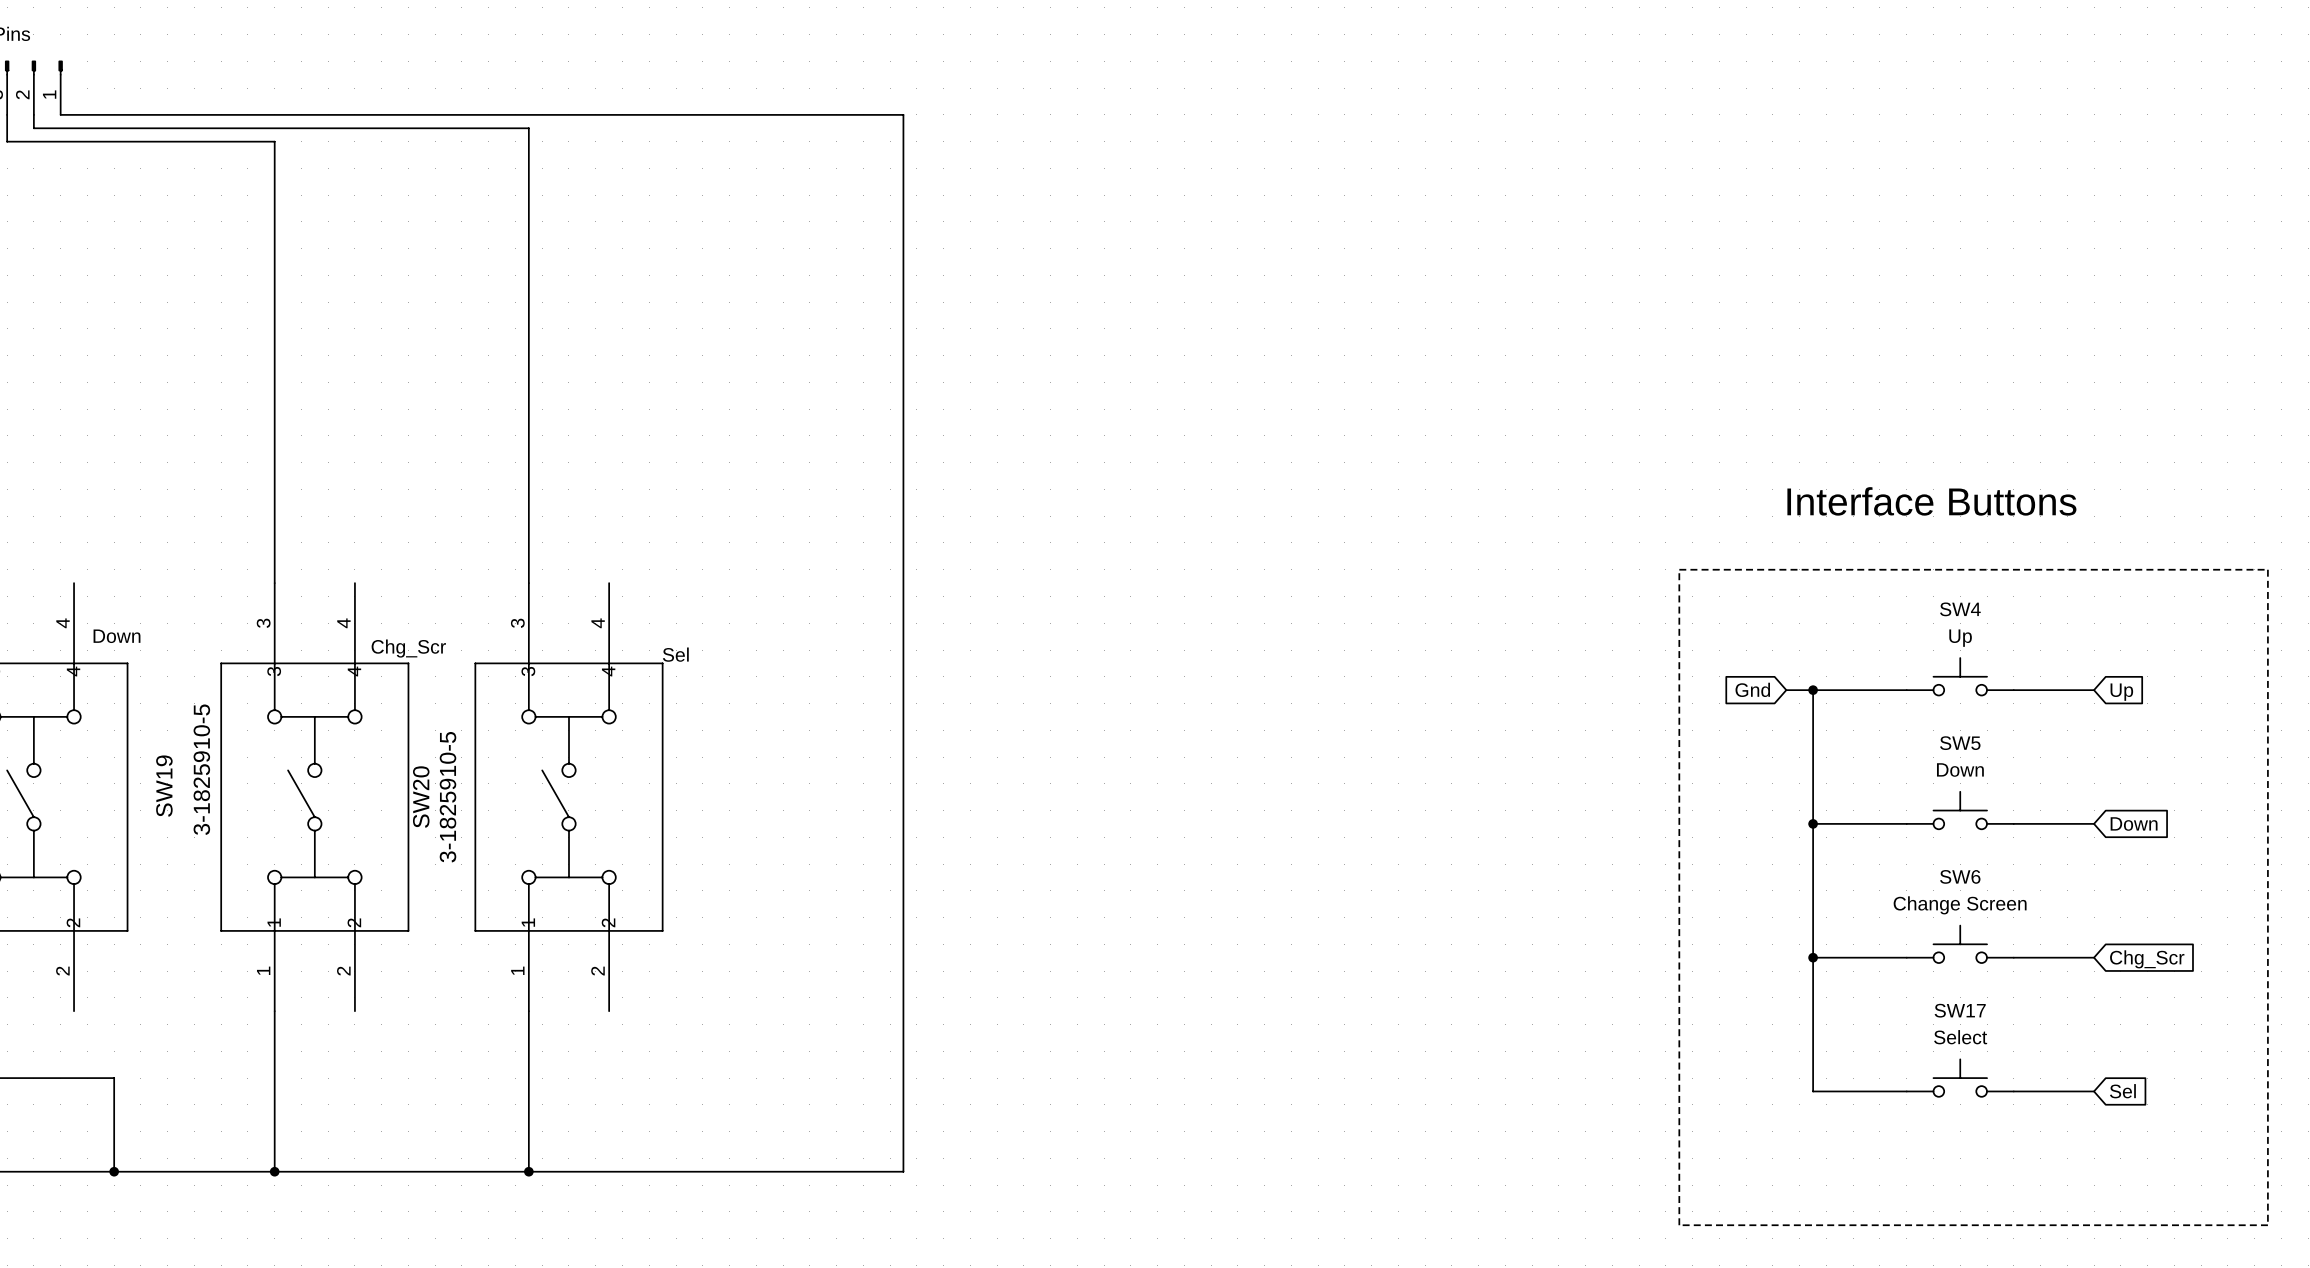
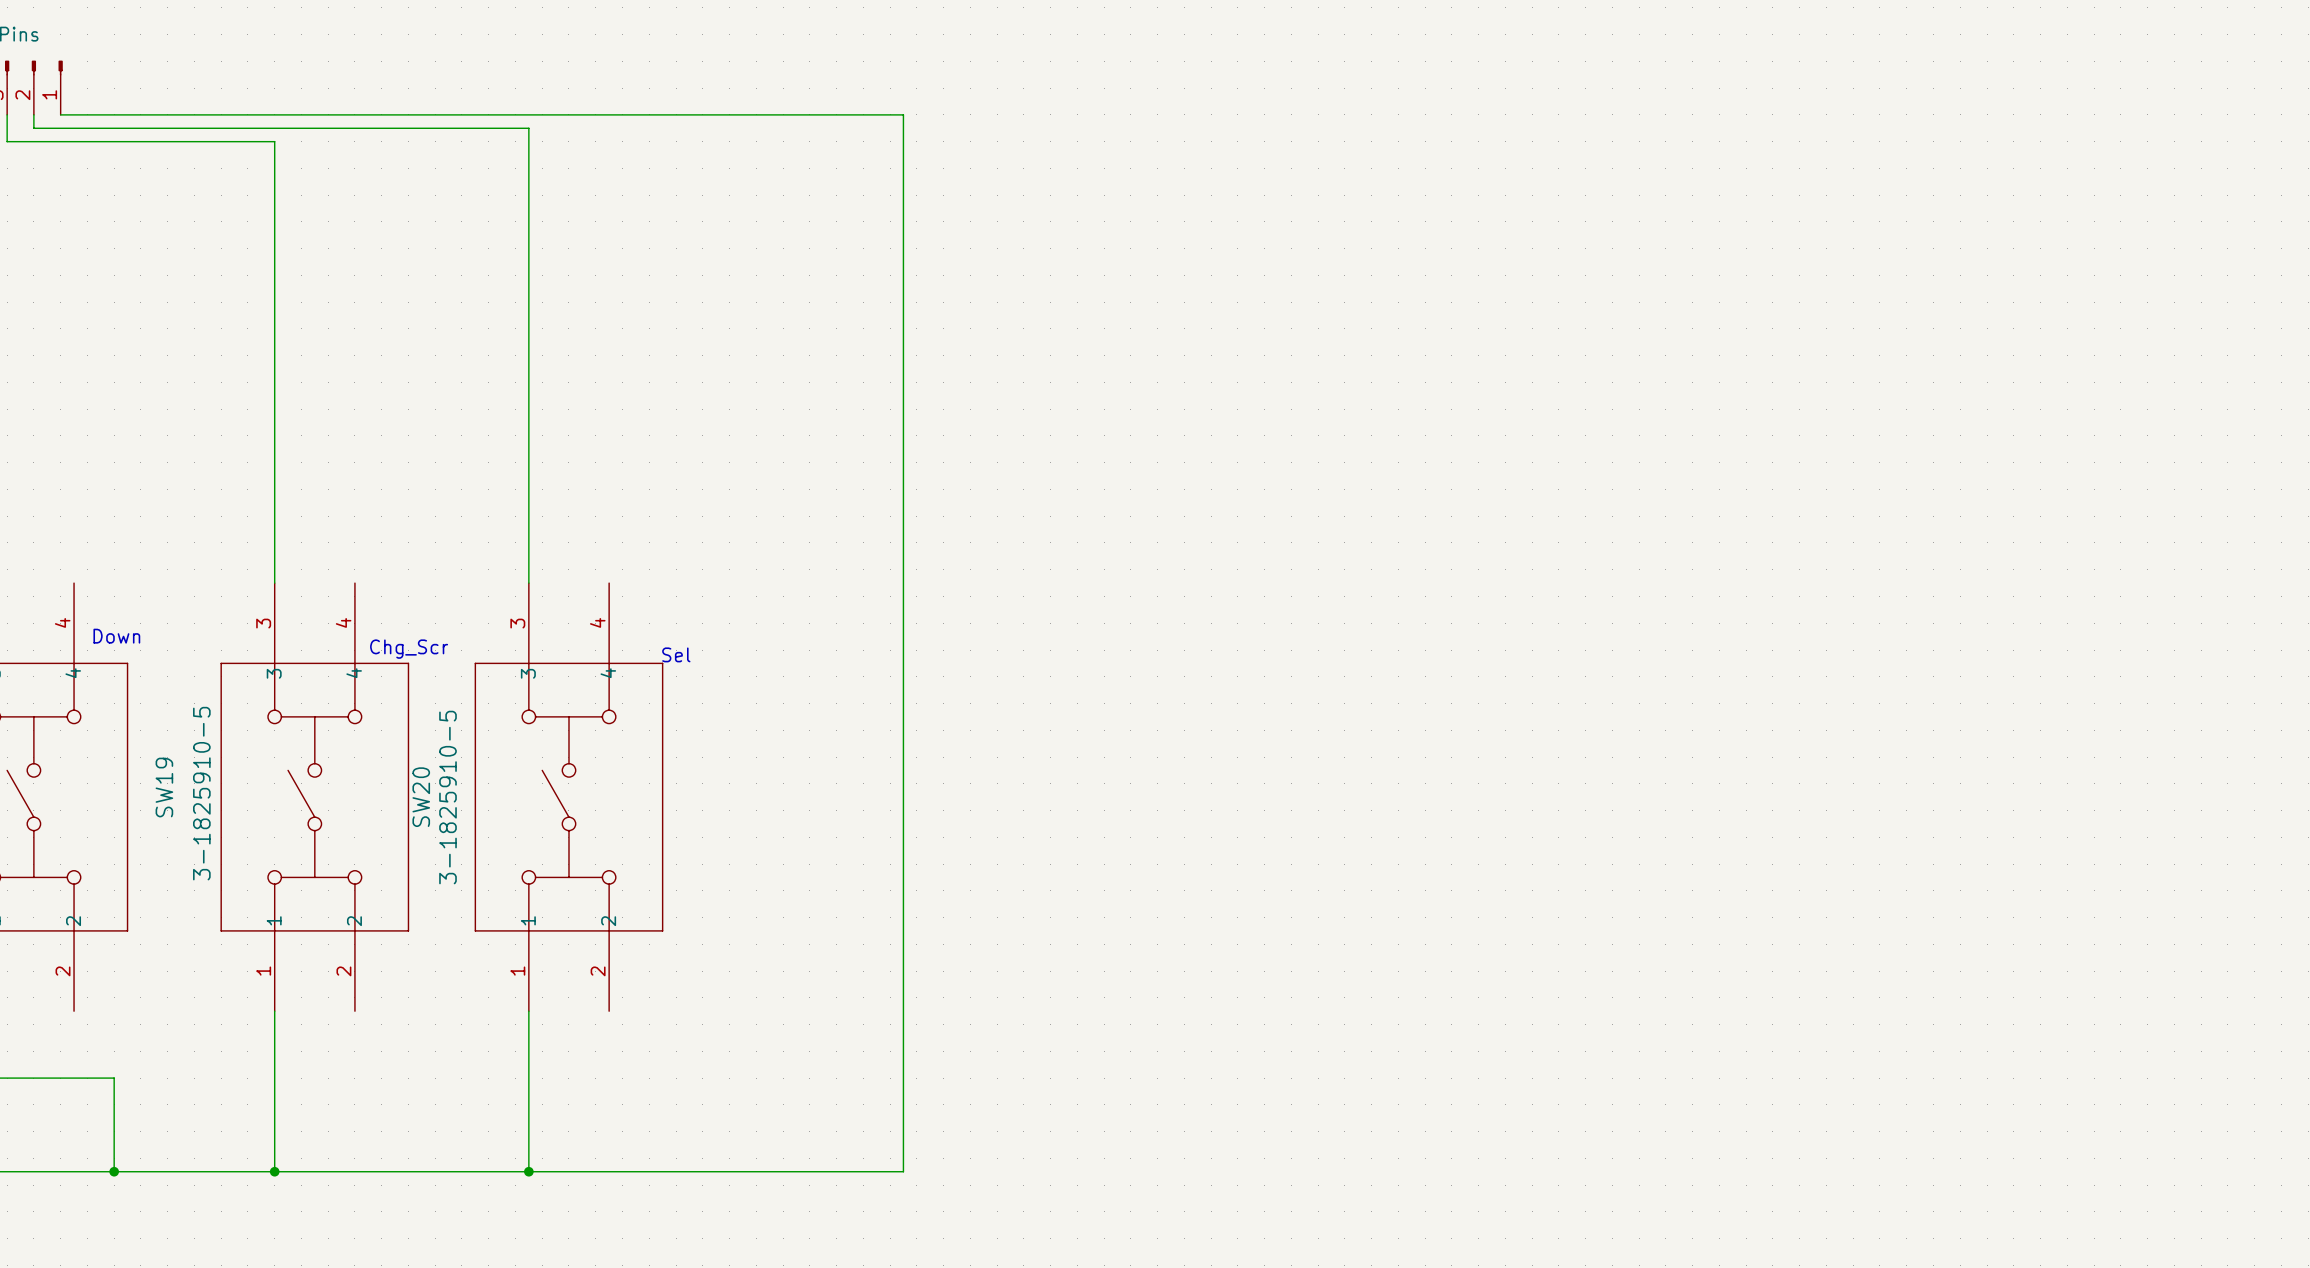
text: Interface Buttons (1931, 501) -> none
line: (1679, 569) (2267, 569) (2267, 1225) (1679, 1225) (1679, 569) -> none
SW4: Up (1960, 676) -> none
global label: Gnd (1752, 689) -> none
wire: (1786, 690) (1906, 690) -> none
wire: (1813, 690) (1813, 1091) (1906, 1091) -> none
junction: (1813, 690) -> none
wire: (2013, 690) (2094, 690) -> none
global label: Up (2121, 692) -> none
SW5: Down (1960, 810) -> none
wire: (1813, 823) (1906, 823) -> none
junction: (1813, 823) -> none
wire: (2013, 823) (2094, 823) -> none
global label: Down (2134, 824) -> none
SW6: Change Screen (1960, 944) -> none
wire: (1813, 957) (1906, 957) -> none
junction: (1813, 957) -> none
wire: (2013, 957) (2094, 957) -> none
global label: Chg_Scr (2147, 959) -> none
SW17: Select (1960, 1078) -> none
wire: (2013, 1091) (2094, 1091) -> none
global label: Sel (2122, 1091) -> none

